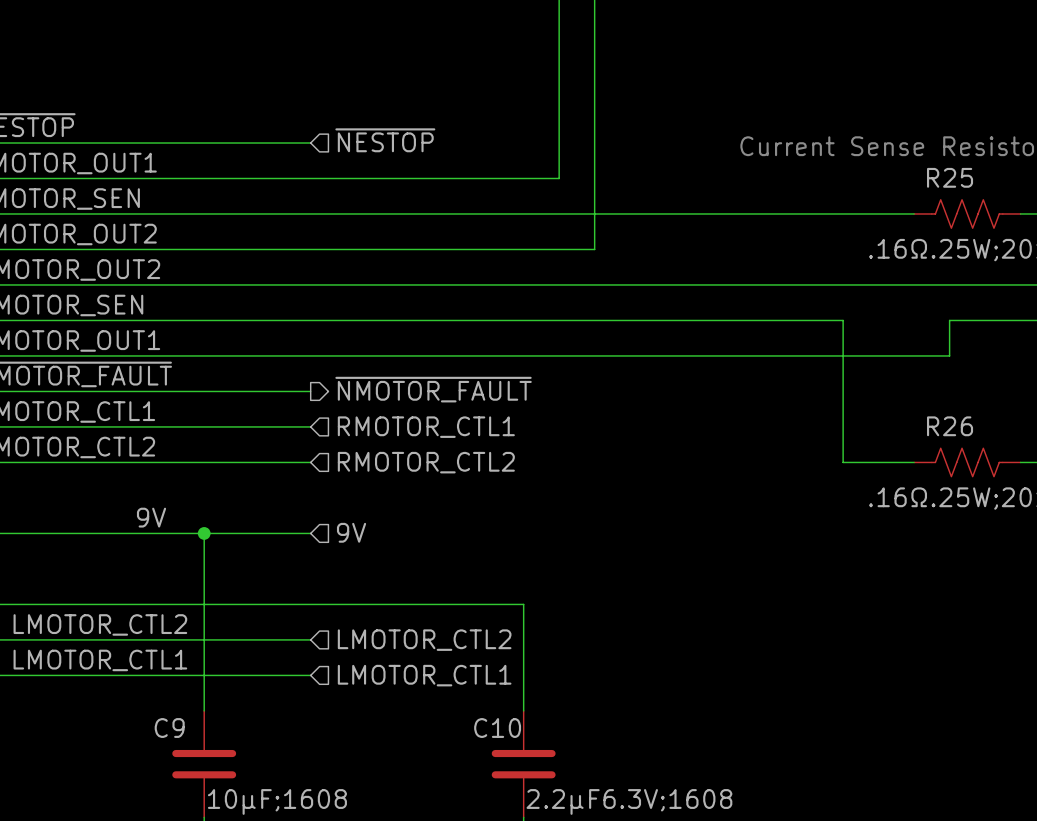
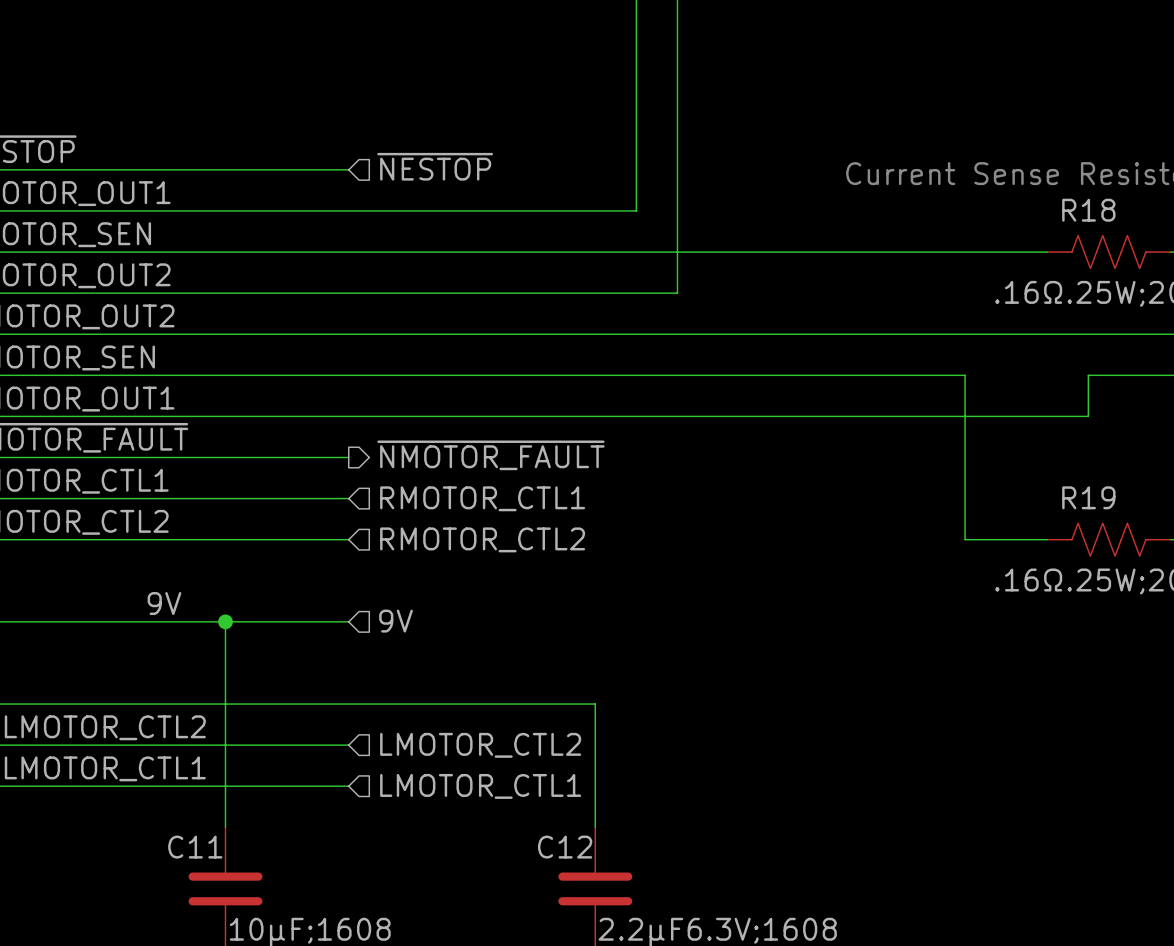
R25 name: R25 (950, 177) -> R18 (1088, 210)
R26 name: R26 (950, 426) -> R19 (1088, 497)
C9 name: C9 (169, 728) -> C11 (195, 847)
C10 name: C10 (497, 728) -> C12 (565, 847)

